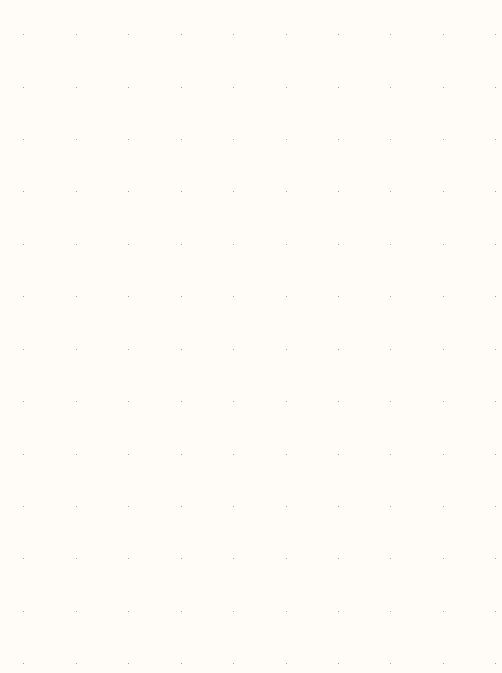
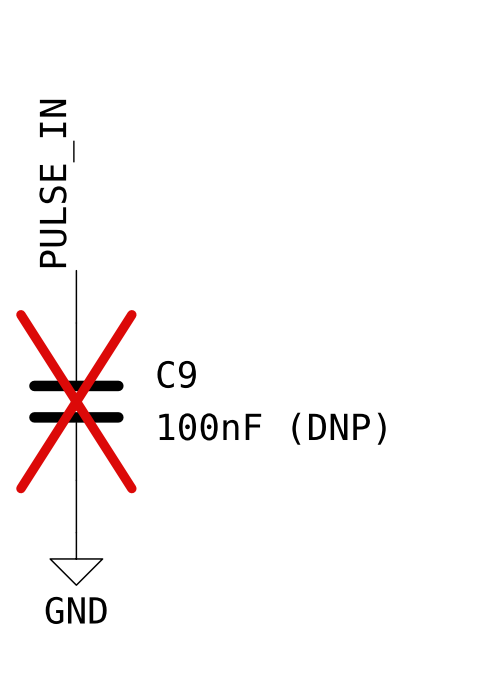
label: none -> PULSE_IN (56, 183)
wire: none -> (76, 270) (76, 323)
C9: none -> 100nF (DNP) (76, 401)
wire: none -> (76, 480) (76, 532)
power symbol: none -> GND (76, 558)

